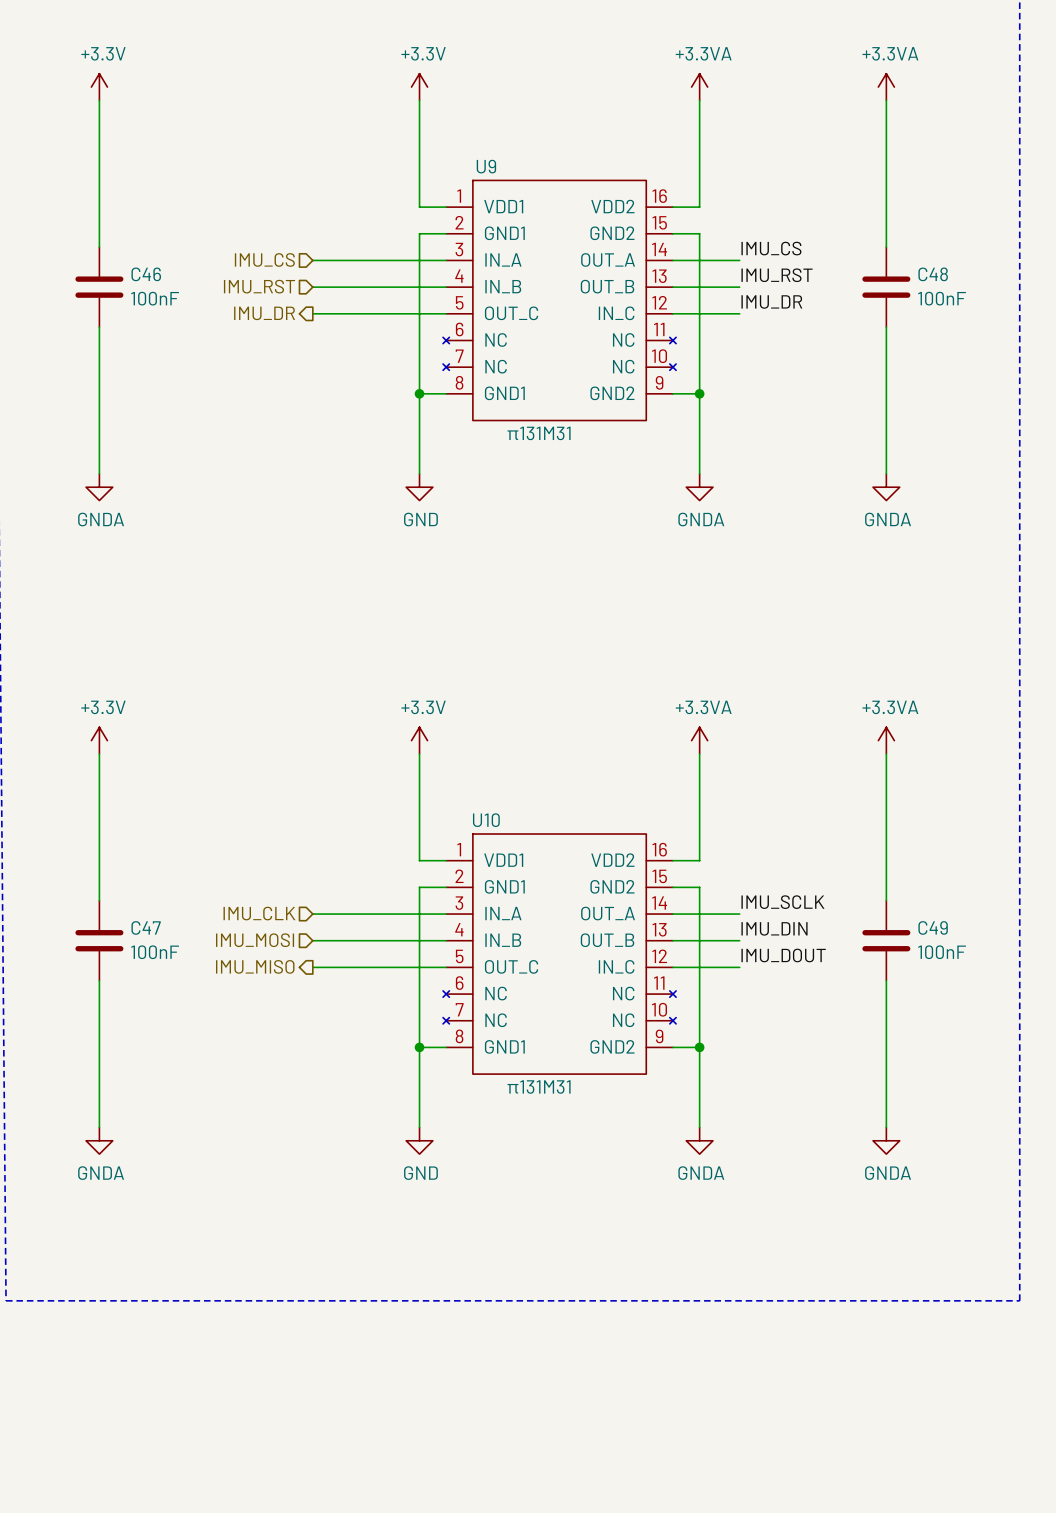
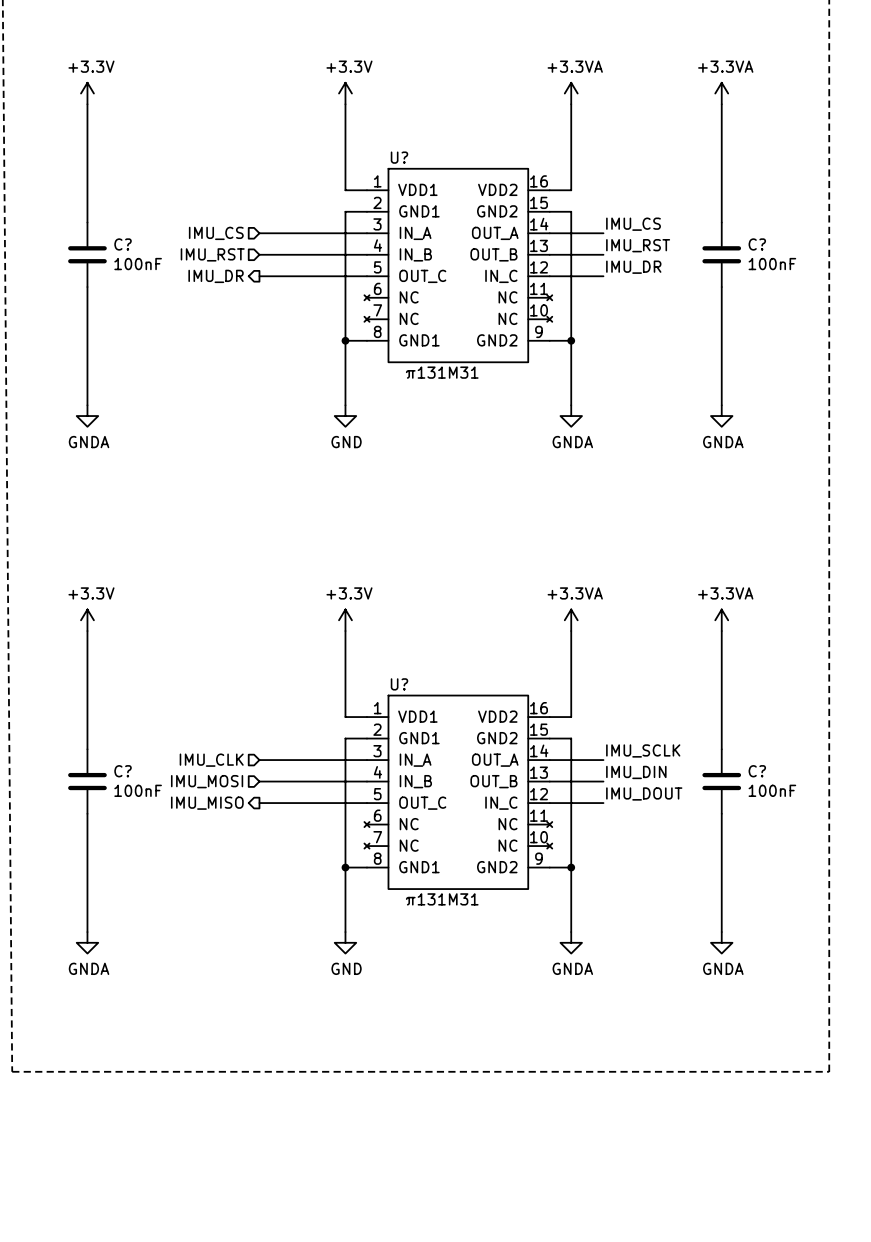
U9 name: U9 (486, 166) -> U? (399, 157)
C46 name: C46 (146, 274) -> C? (123, 244)
C48 name: C48 (933, 274) -> C? (757, 244)
U10 name: U10 (486, 820) -> U? (399, 684)
C47 name: C47 (146, 927) -> C? (123, 771)
C49 name: C49 (933, 927) -> C? (757, 771)

